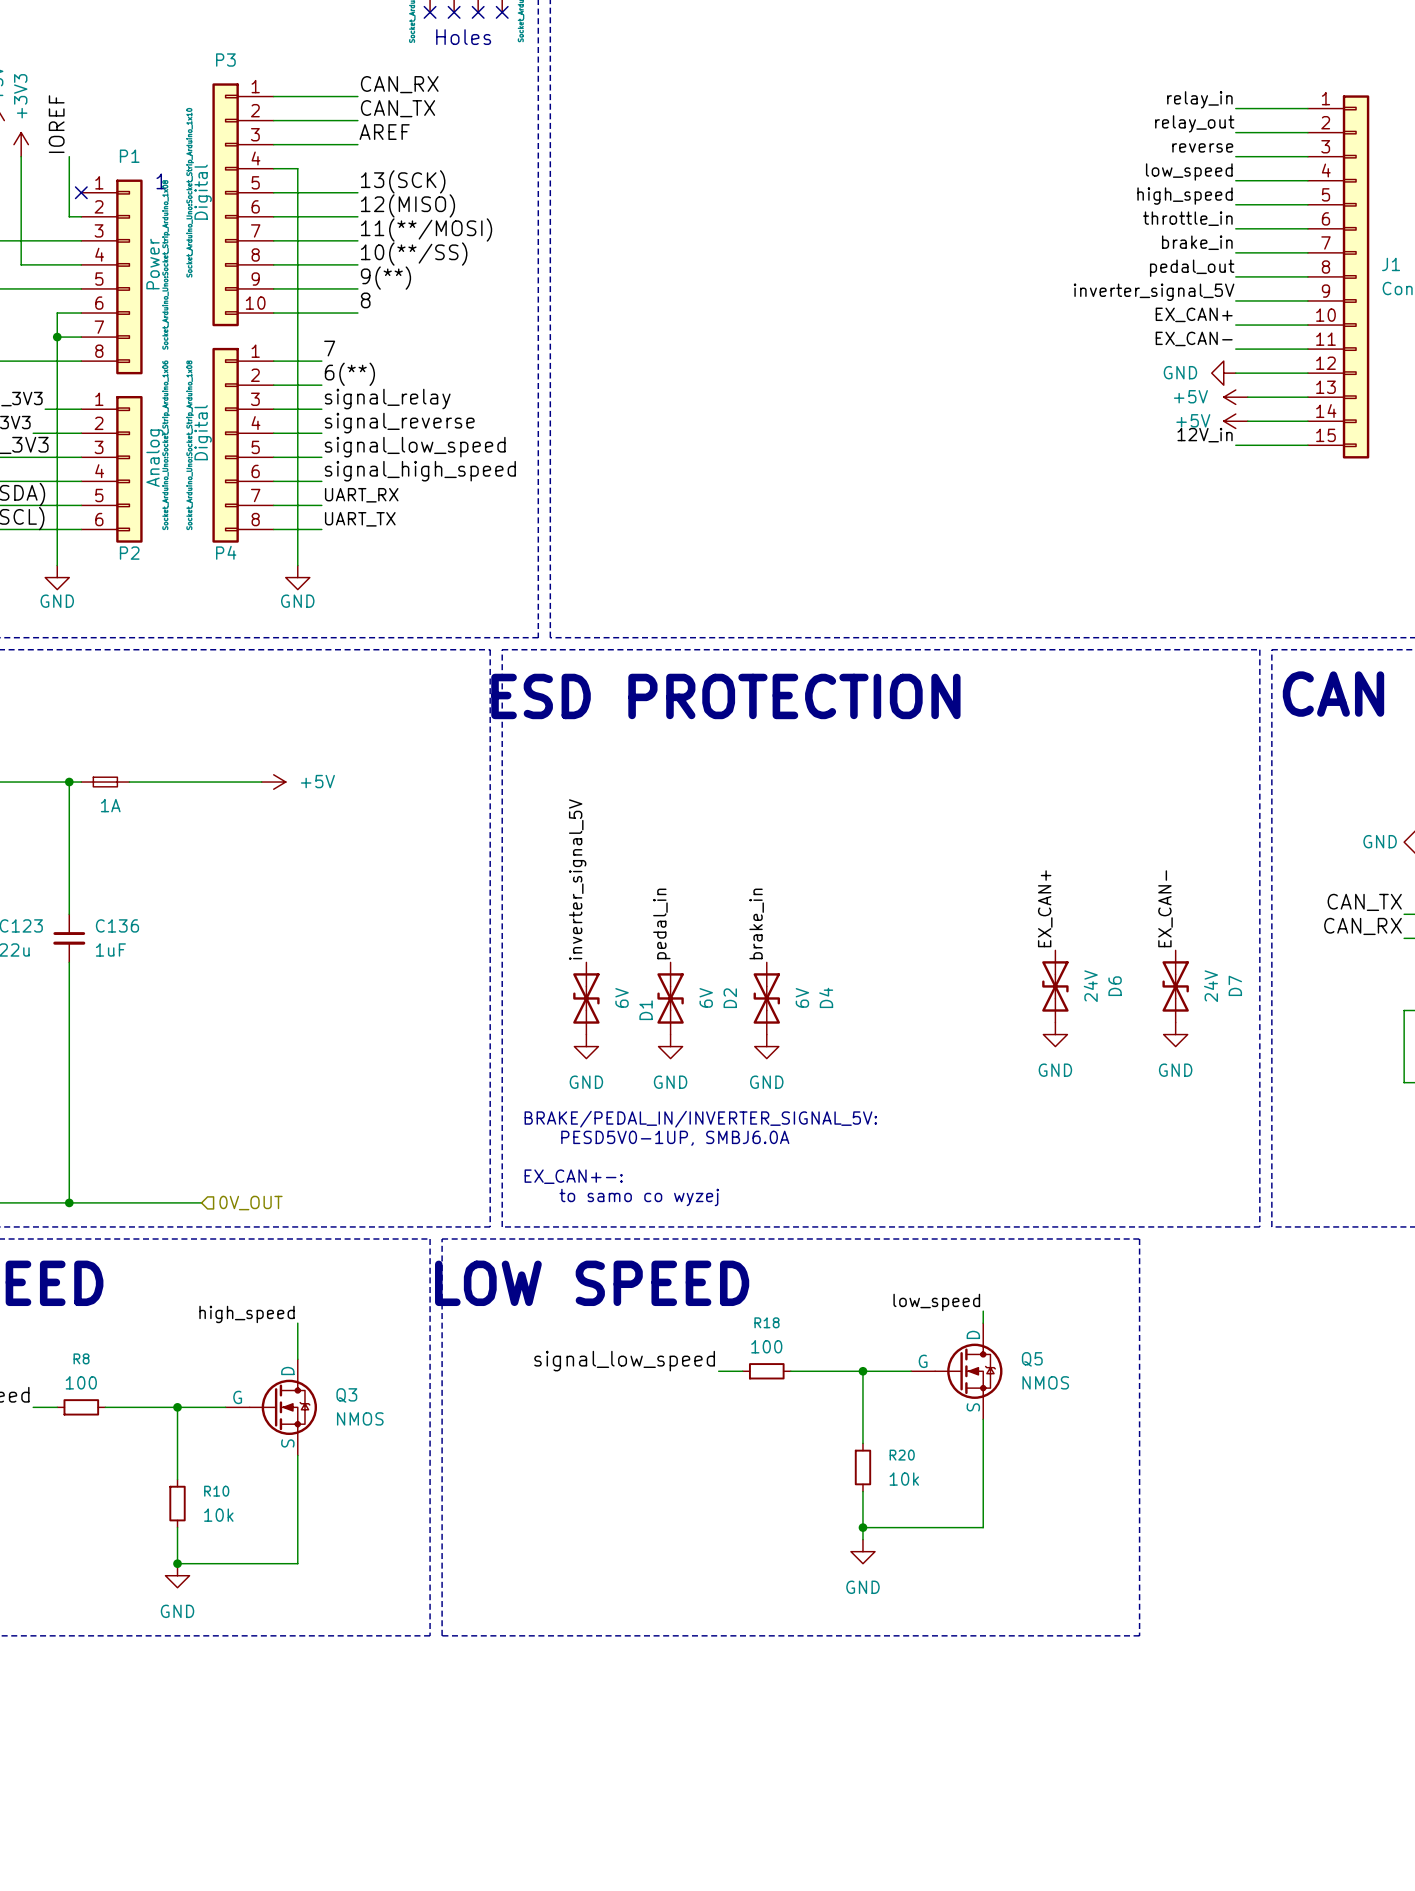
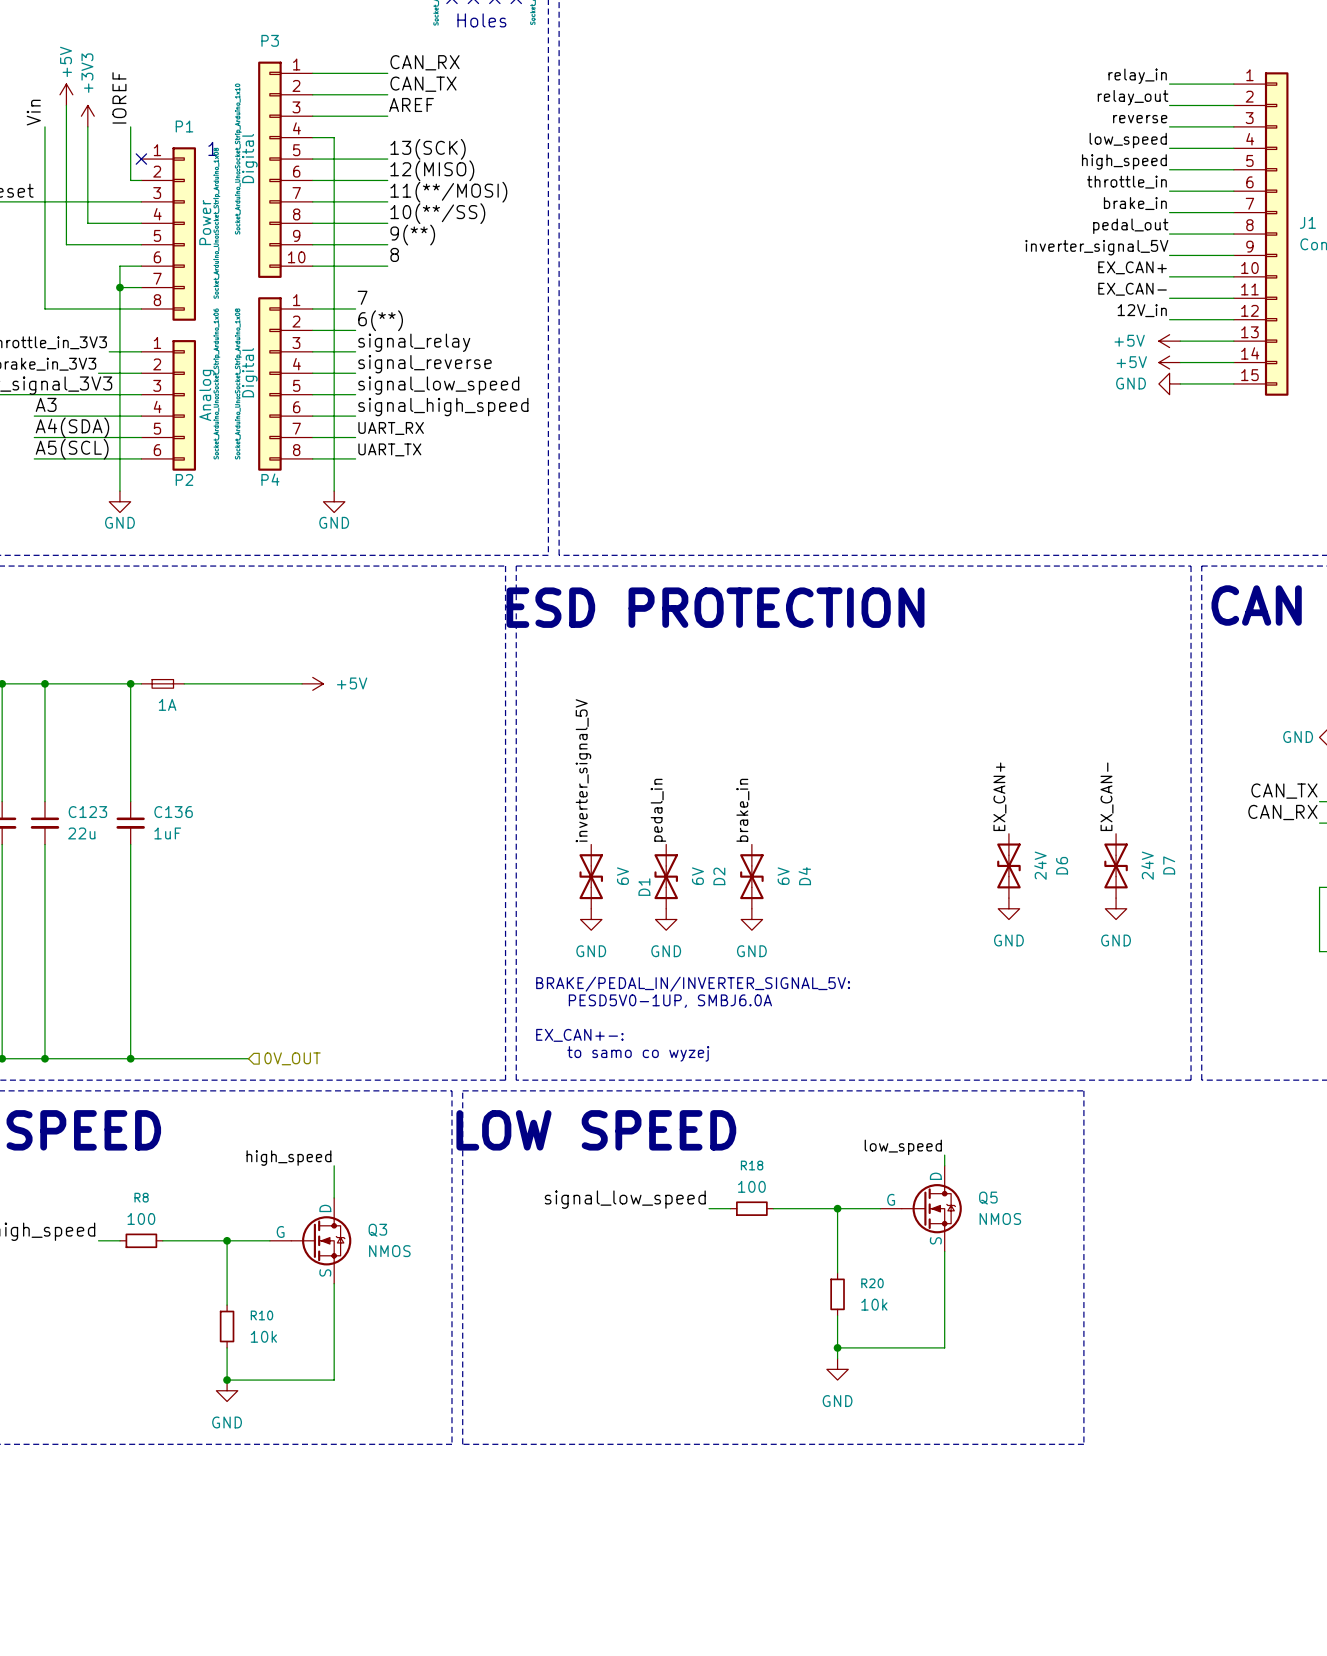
power symbol position: GND (1223, 373) -> GND (1169, 383)
label position: 12V_in (1205, 435) -> 12V_in (1142, 310)

